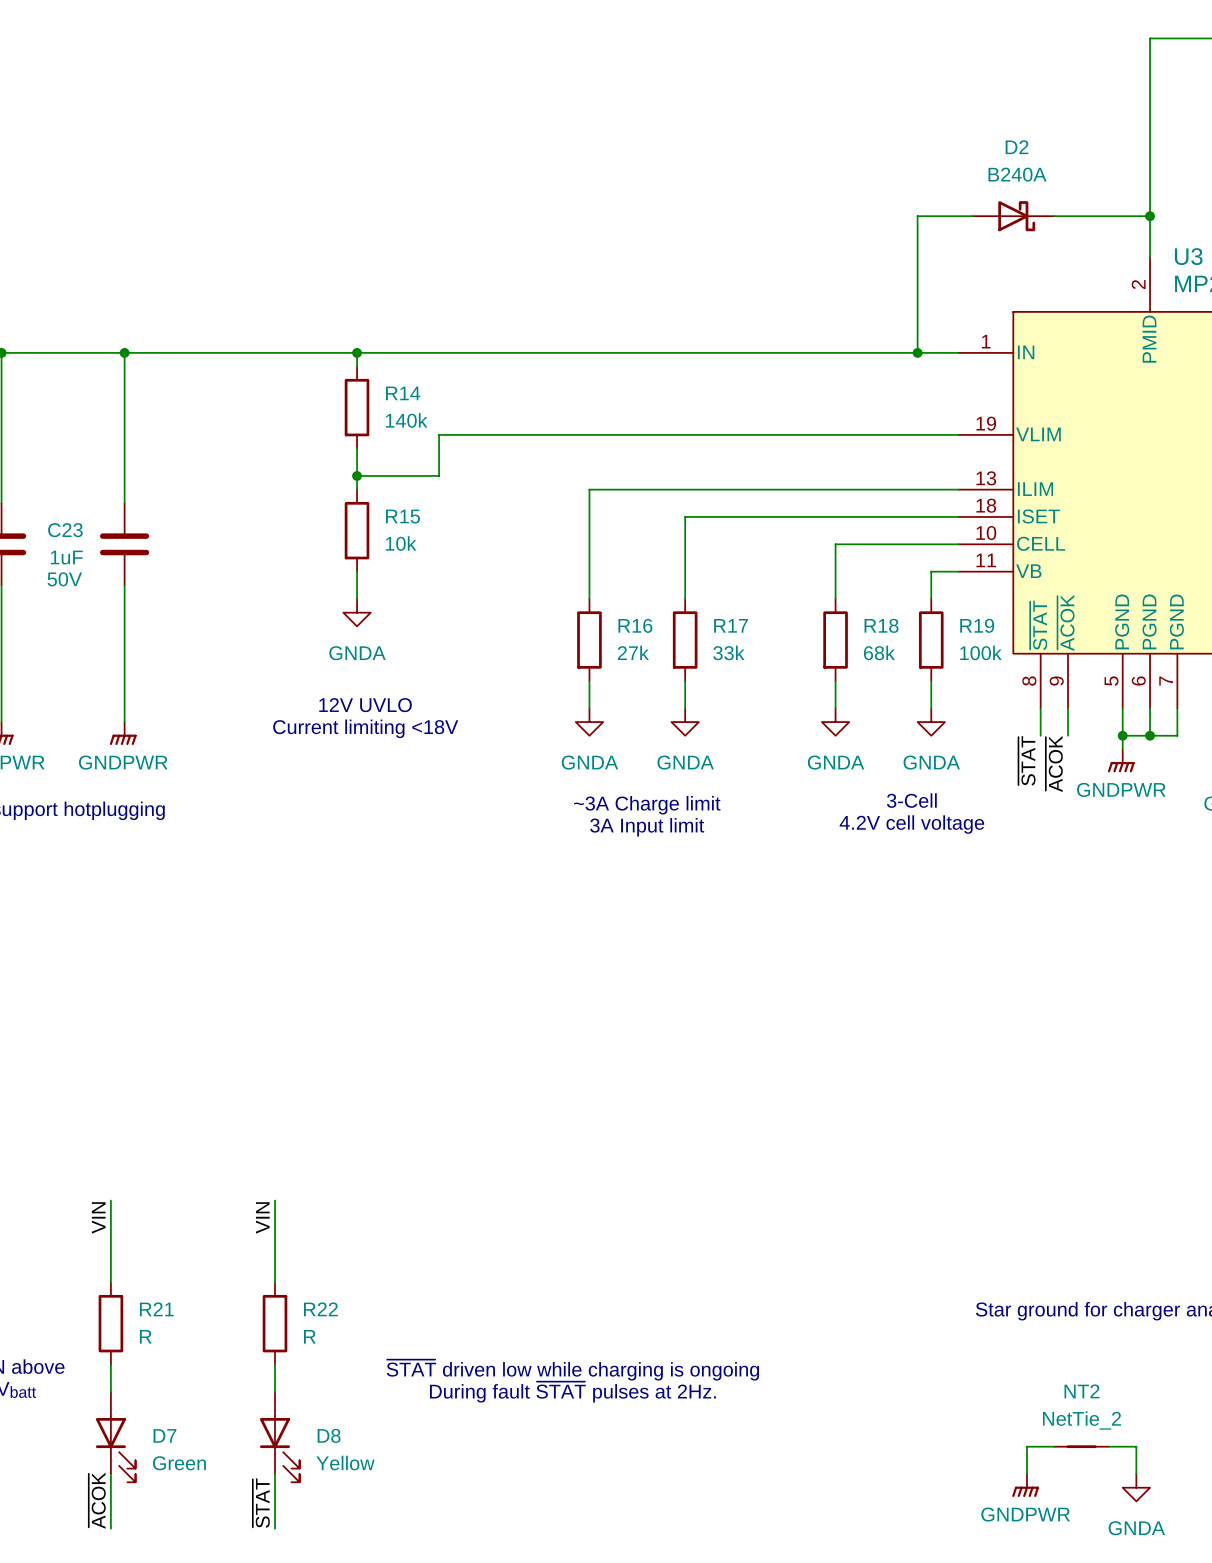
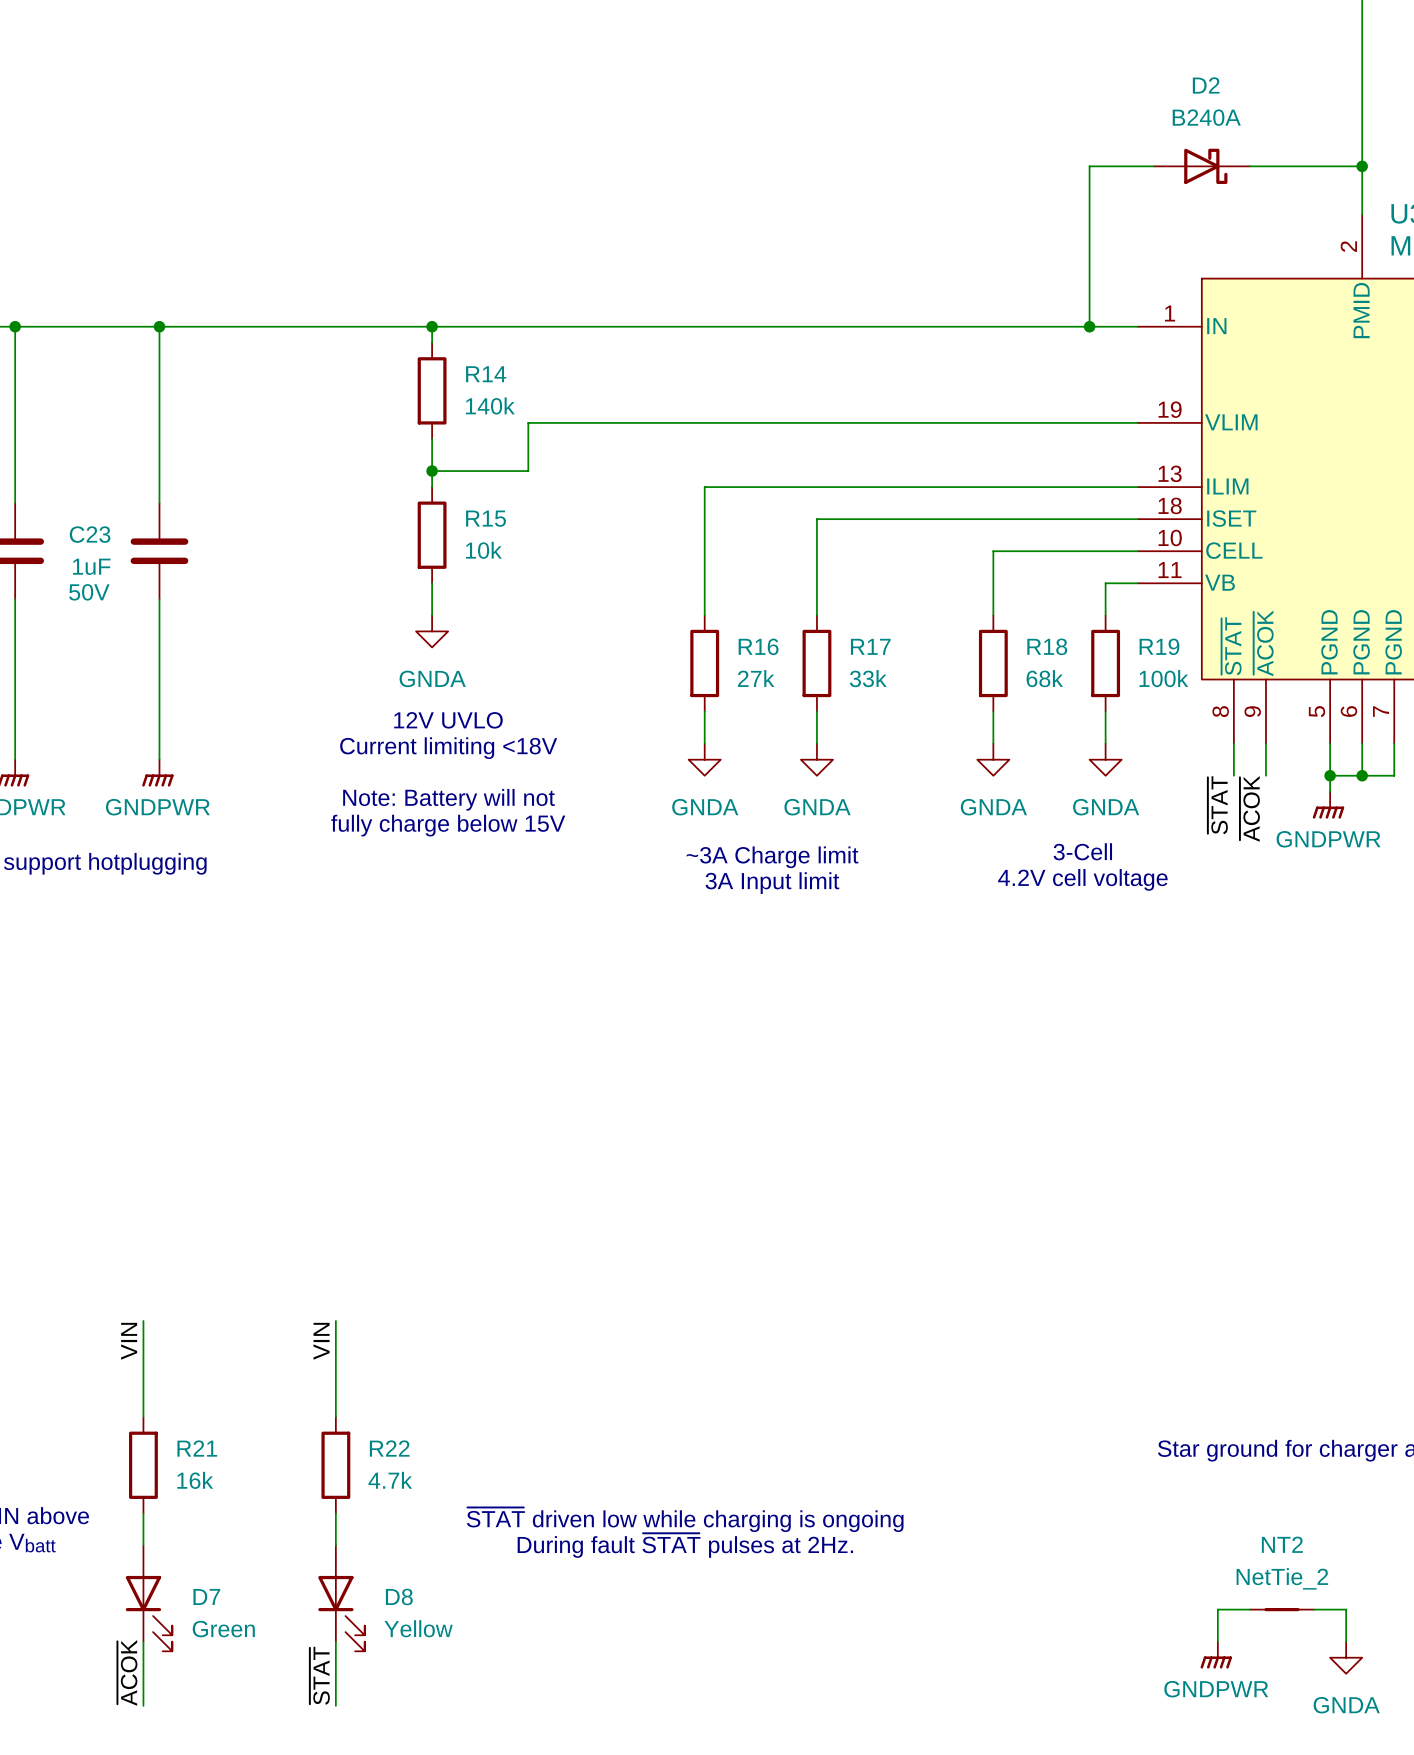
text: none -> 12V UVLO (448, 720)
text: 12V UVLO (365, 705) -> Current limiting <18V (448, 748)
text: Current limiting <18V (365, 728) -> none
text: none -> Note: Battery will not (449, 799)
text: none -> fully charge below 15V (448, 825)
R21 value: R (145, 1336) -> 16k (195, 1480)
R22 value: R (309, 1336) -> 4.7k (390, 1480)

